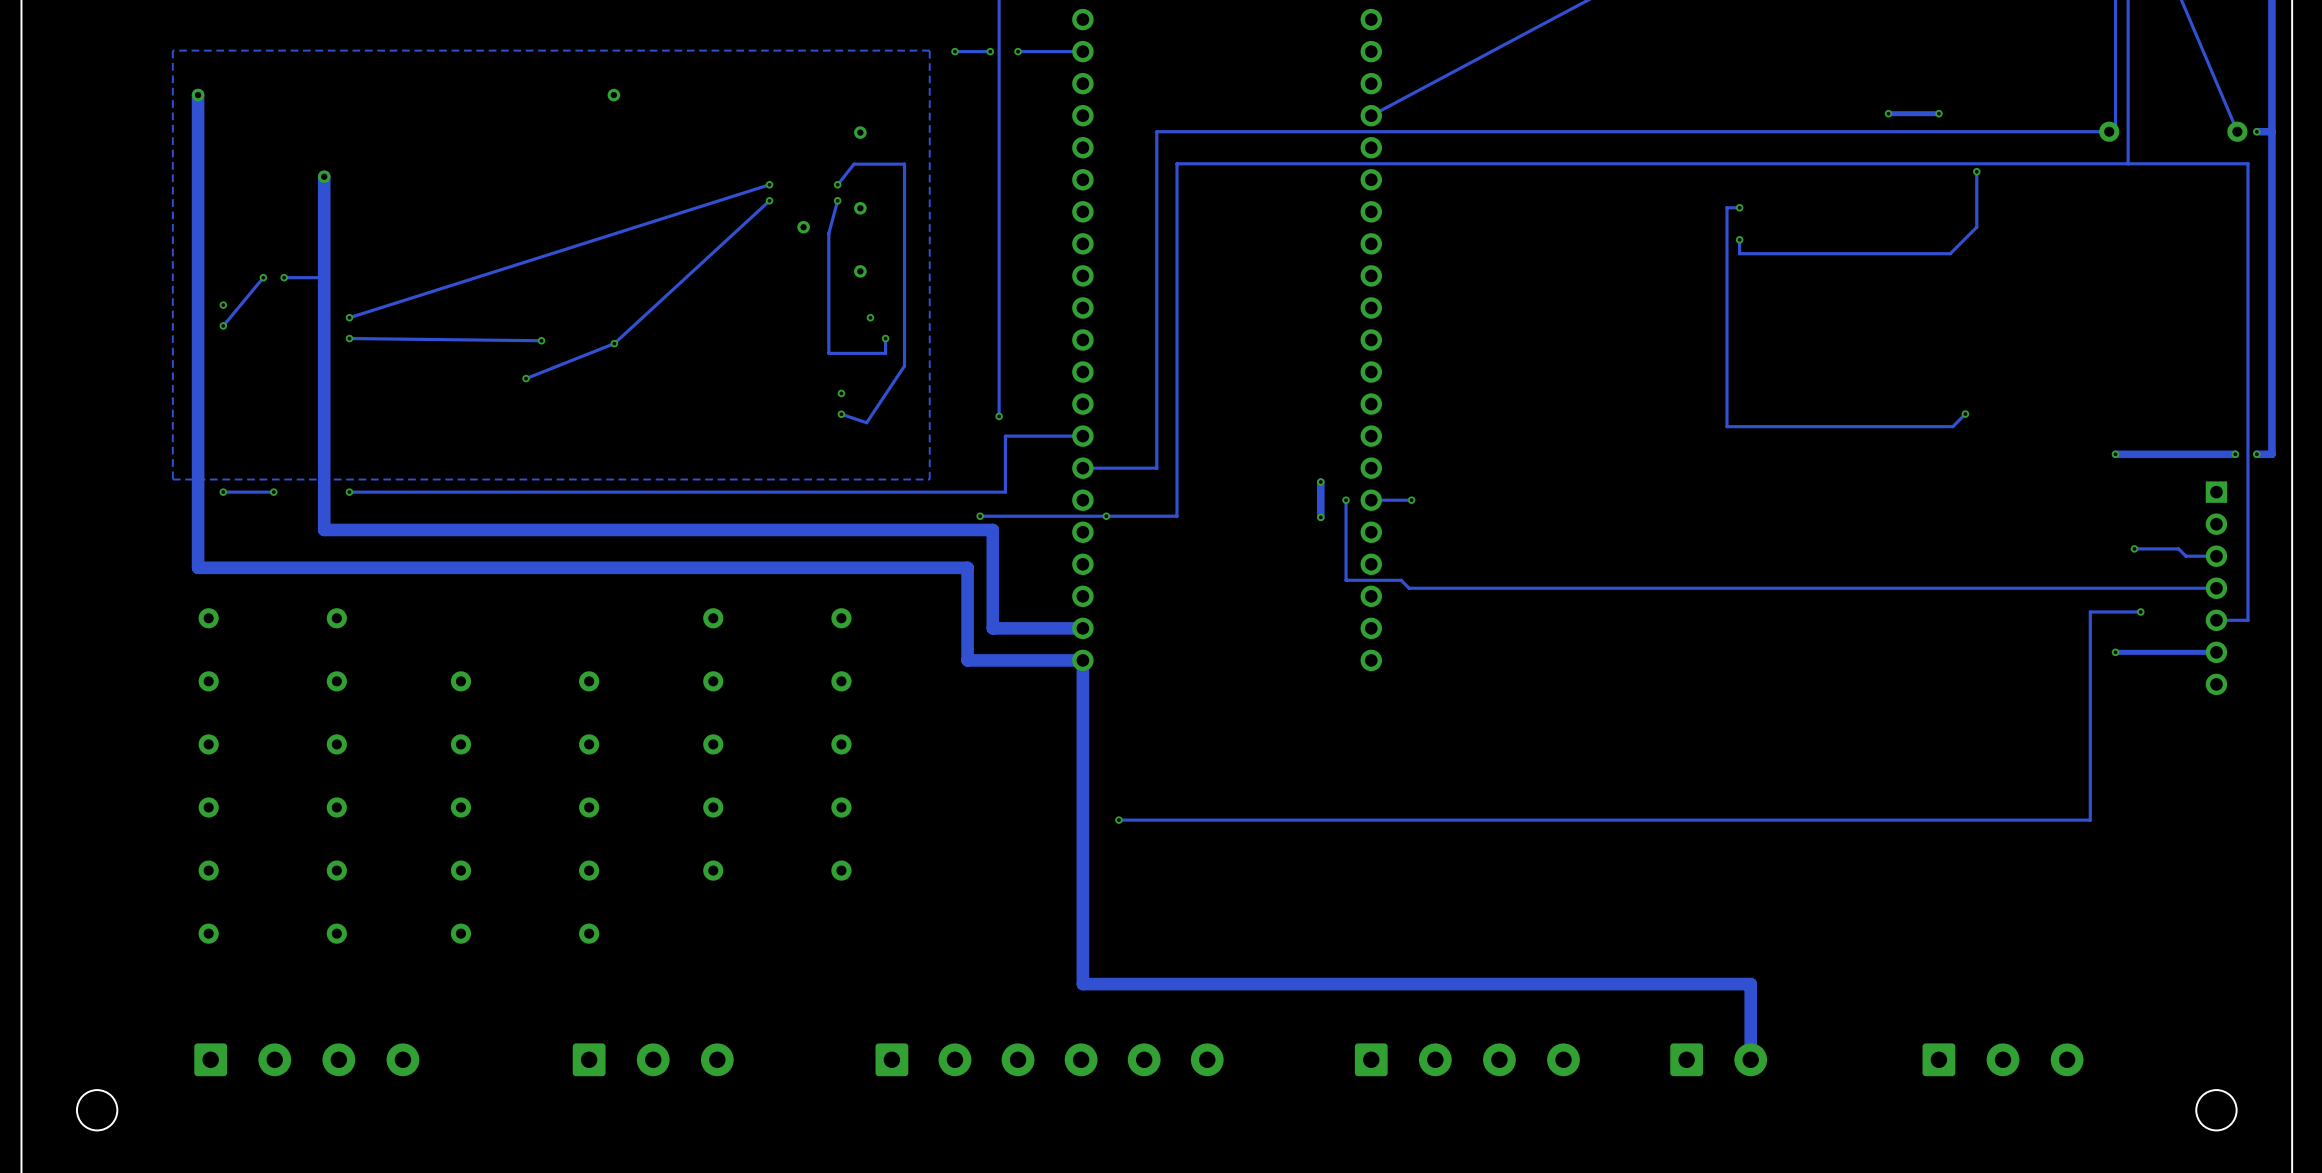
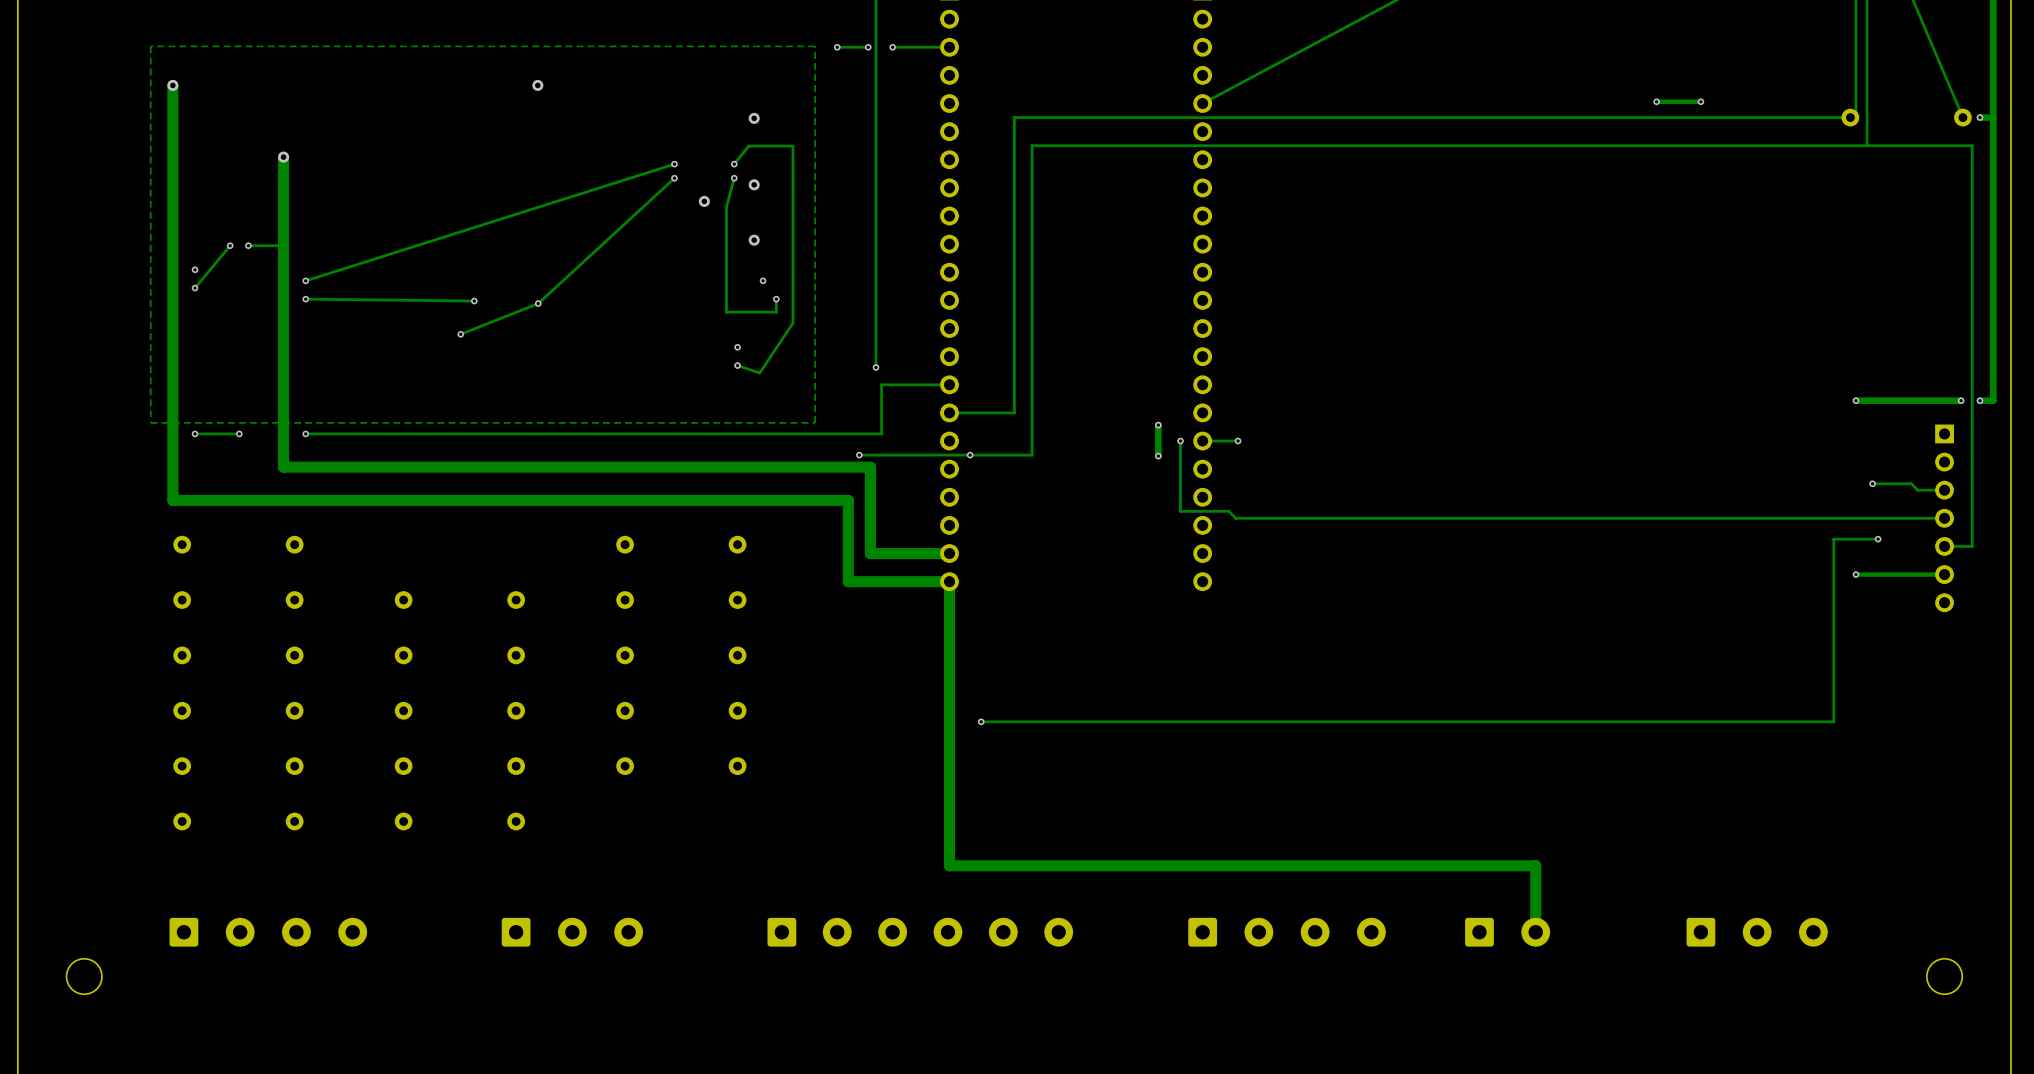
track: (1976, 171) (1976, 227) (1950, 253) (1739, 253) (1739, 239) -> none
via: (1976, 171) -> none
track: (1739, 207) (1727, 207) (1727, 426) (1952, 426) (1965, 414) -> none
via: (1739, 207) -> none
via: (1739, 239) -> none
via: (1965, 414) -> none

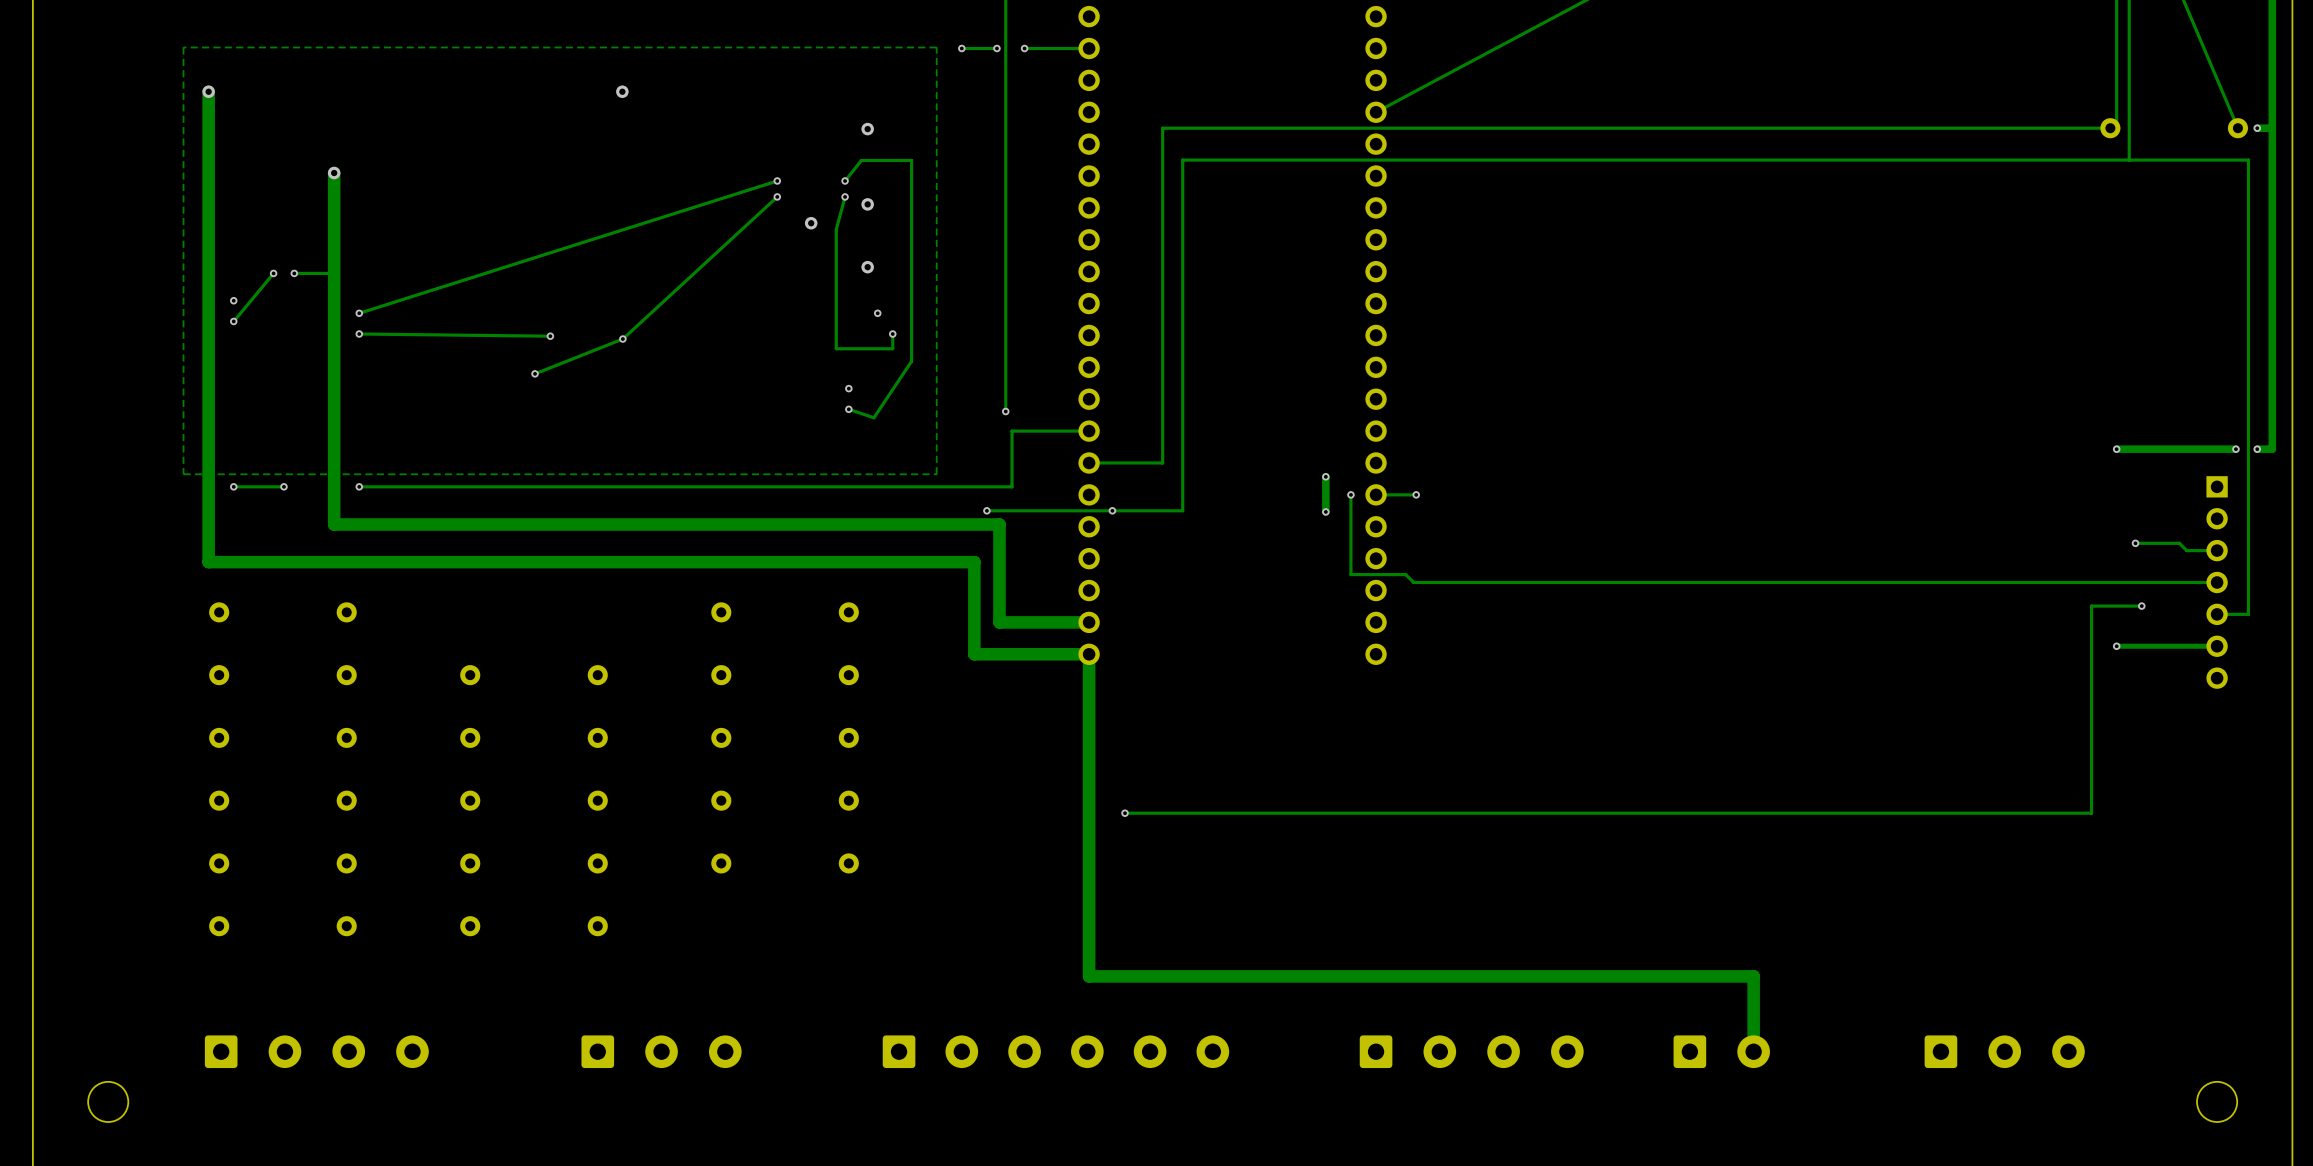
via: (1656, 101) -> none
track: (1700, 101) (1656, 101) -> none
via: (1700, 101) -> none

